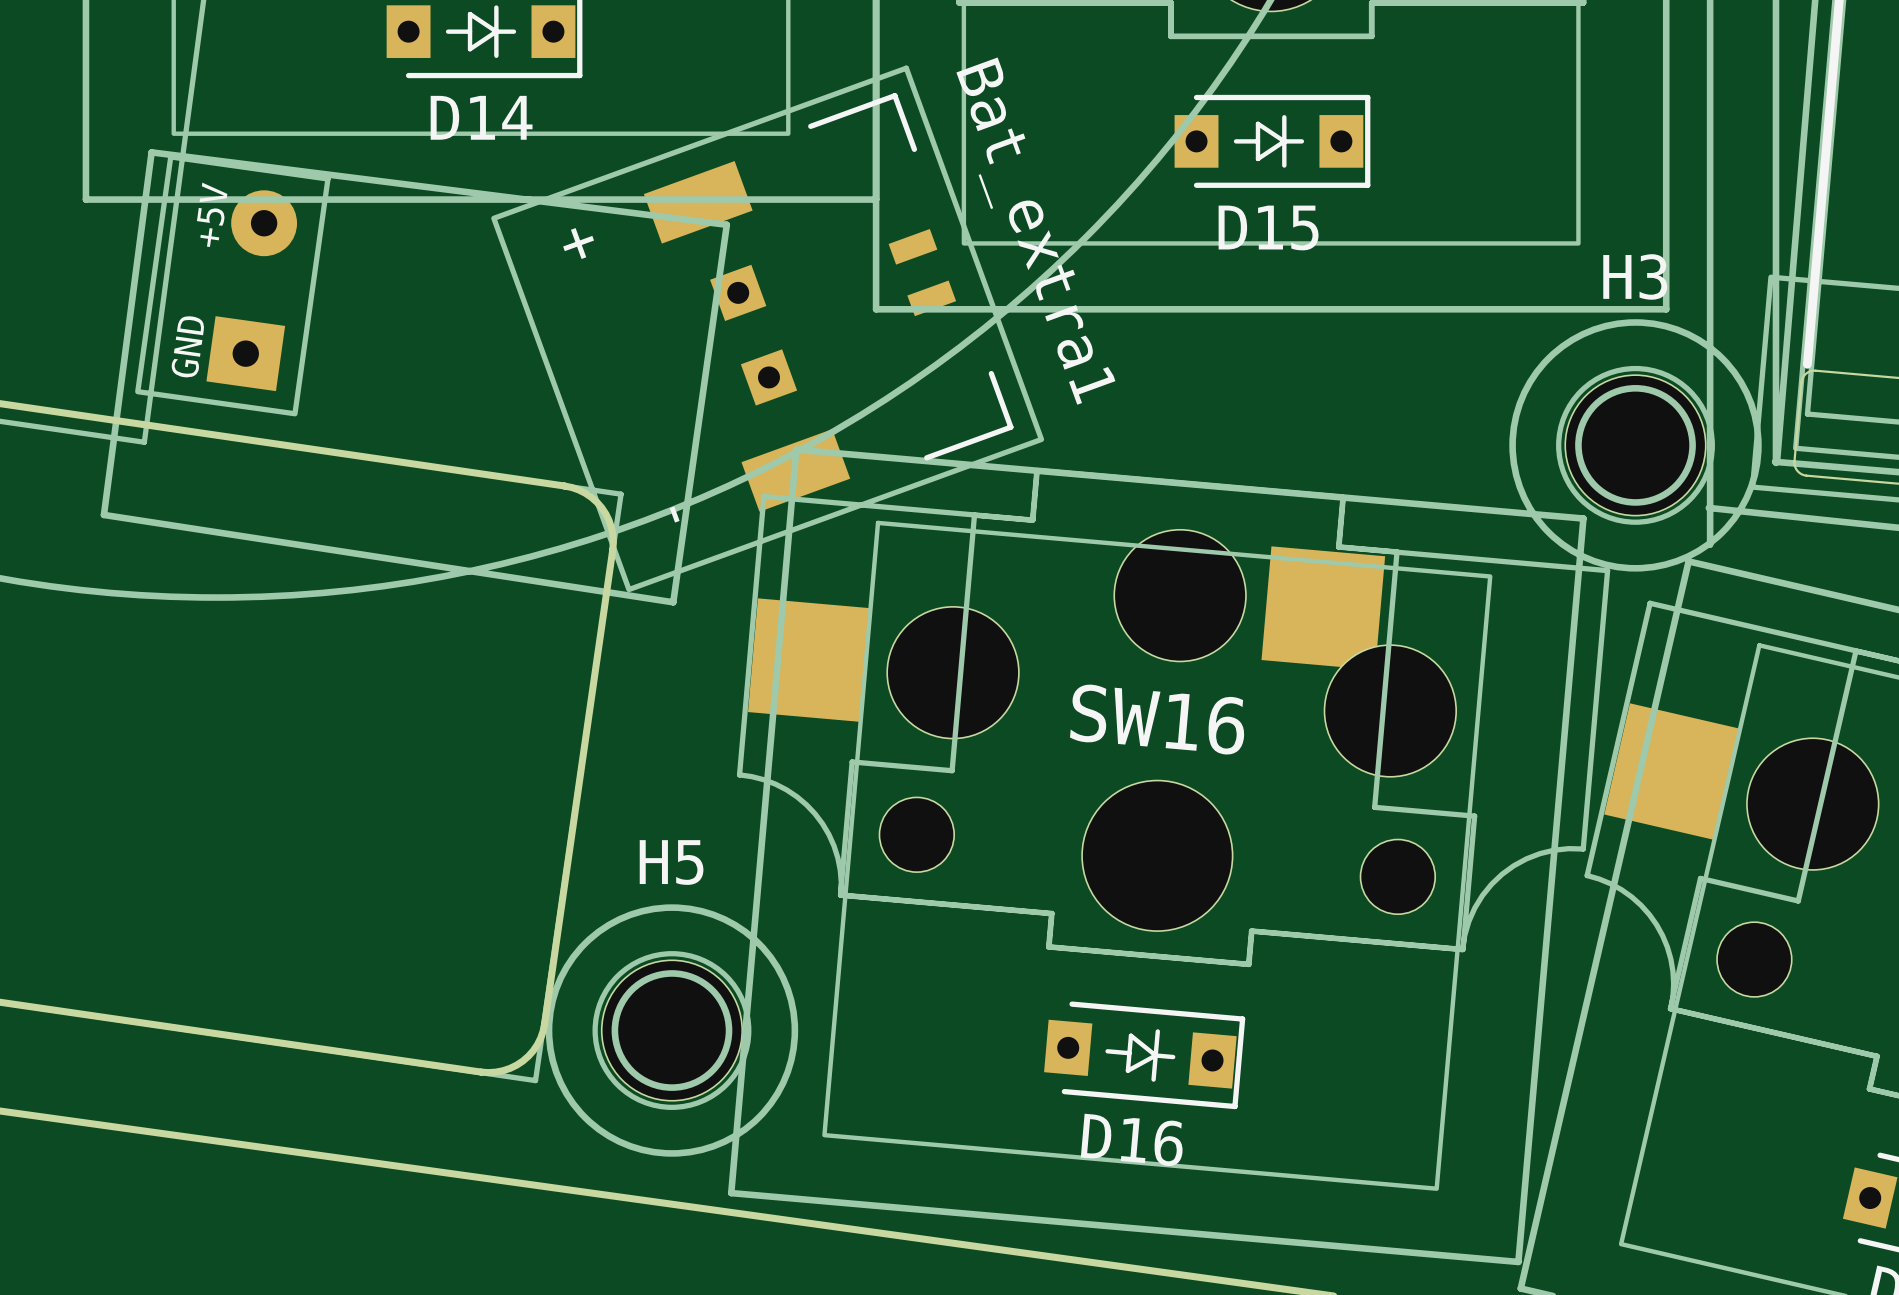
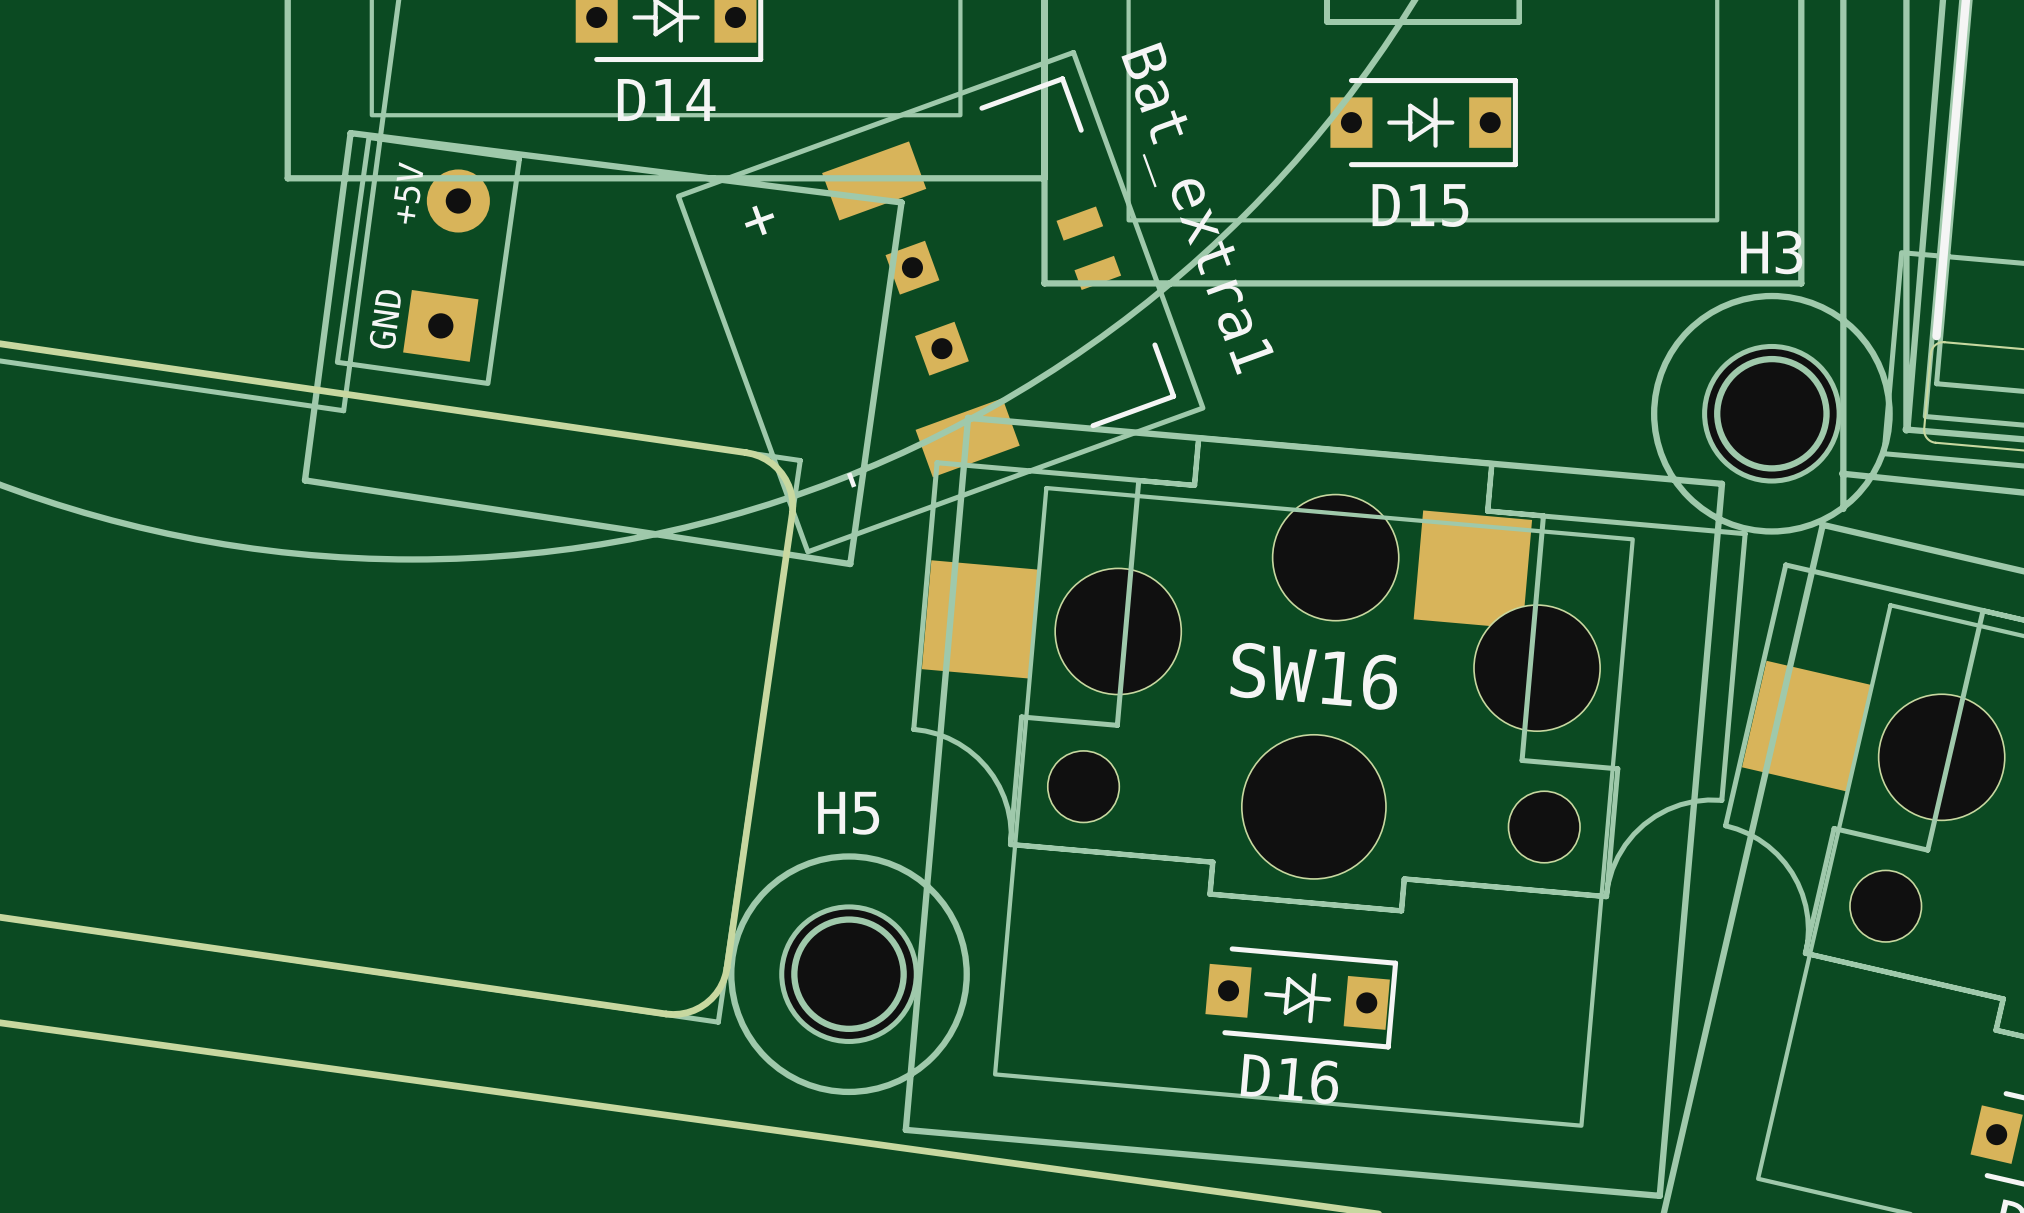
H3 footprint: [1509, 319, 1762, 572] -> [1651, 292, 1893, 535]
H5 footprint: [545, 904, 799, 1157] -> [728, 853, 970, 1096]

